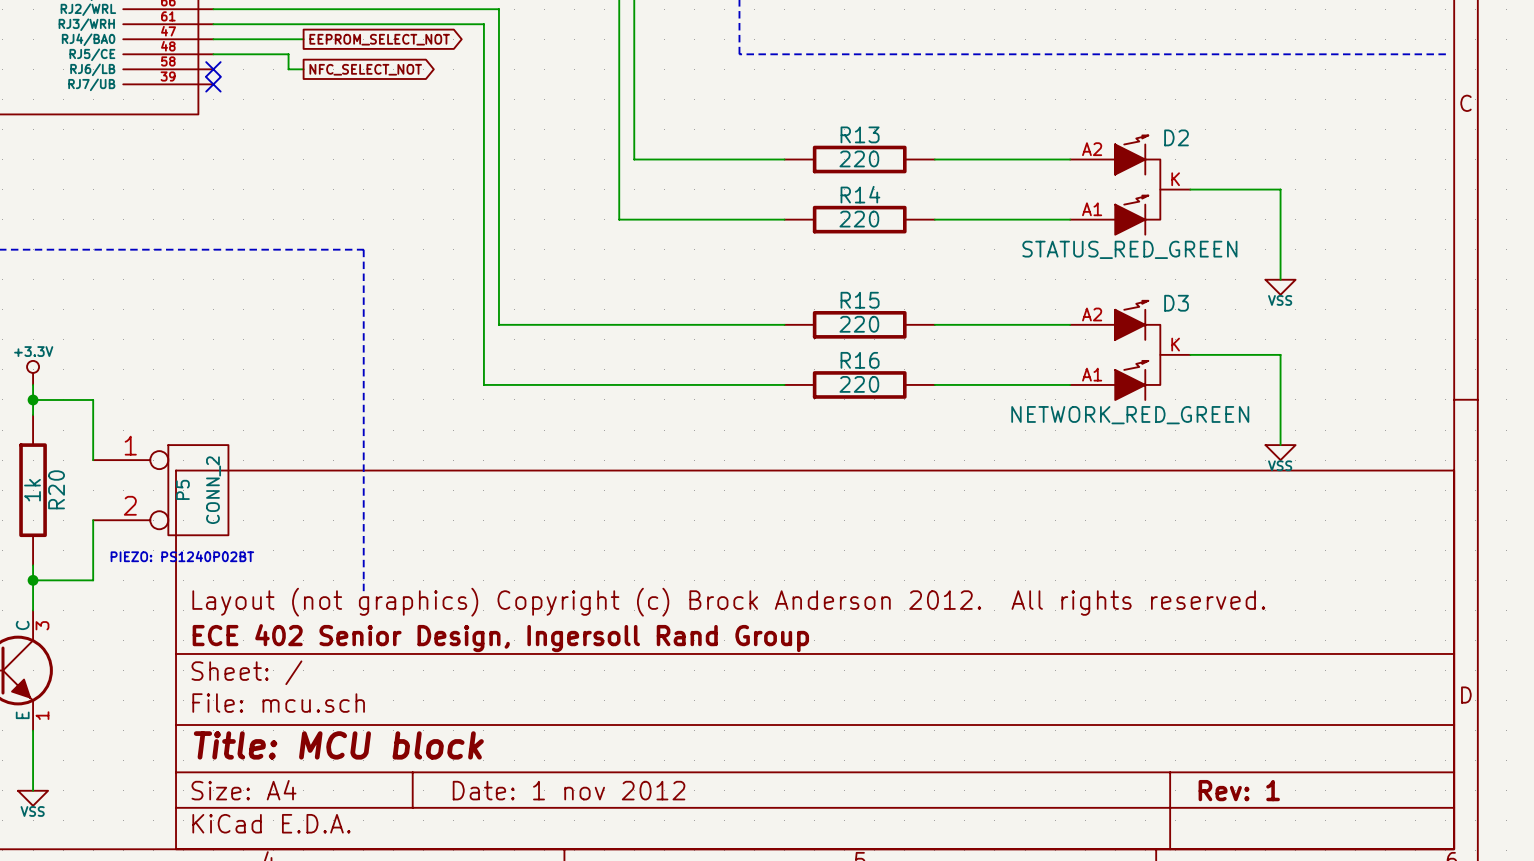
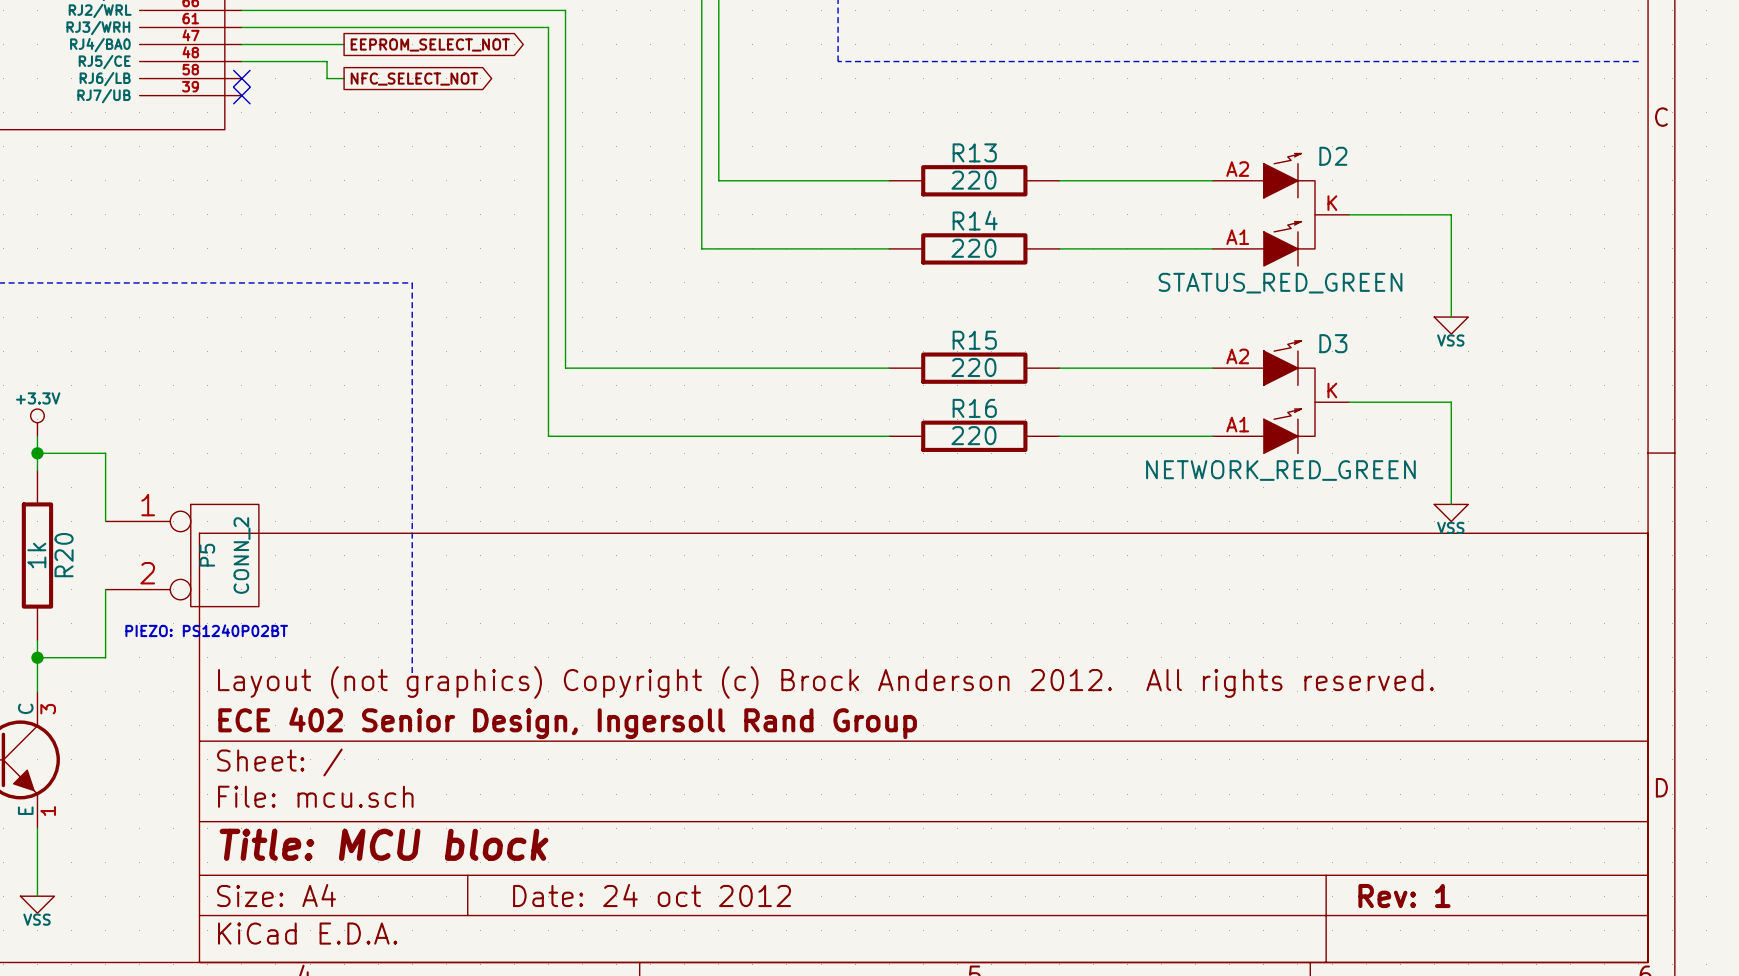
title block: Date: 1 nov 2012 (569, 790) -> Date: 24 oct 2012 (652, 895)

